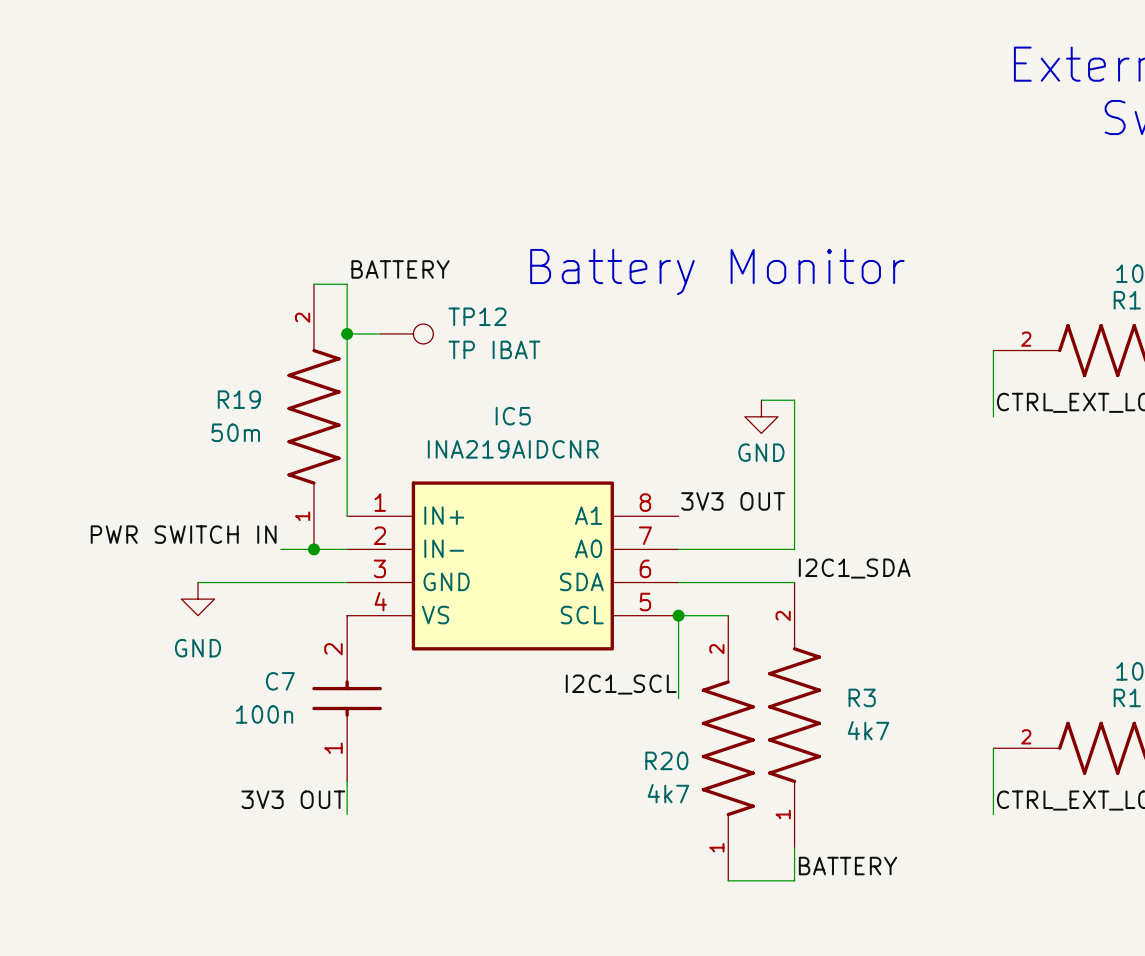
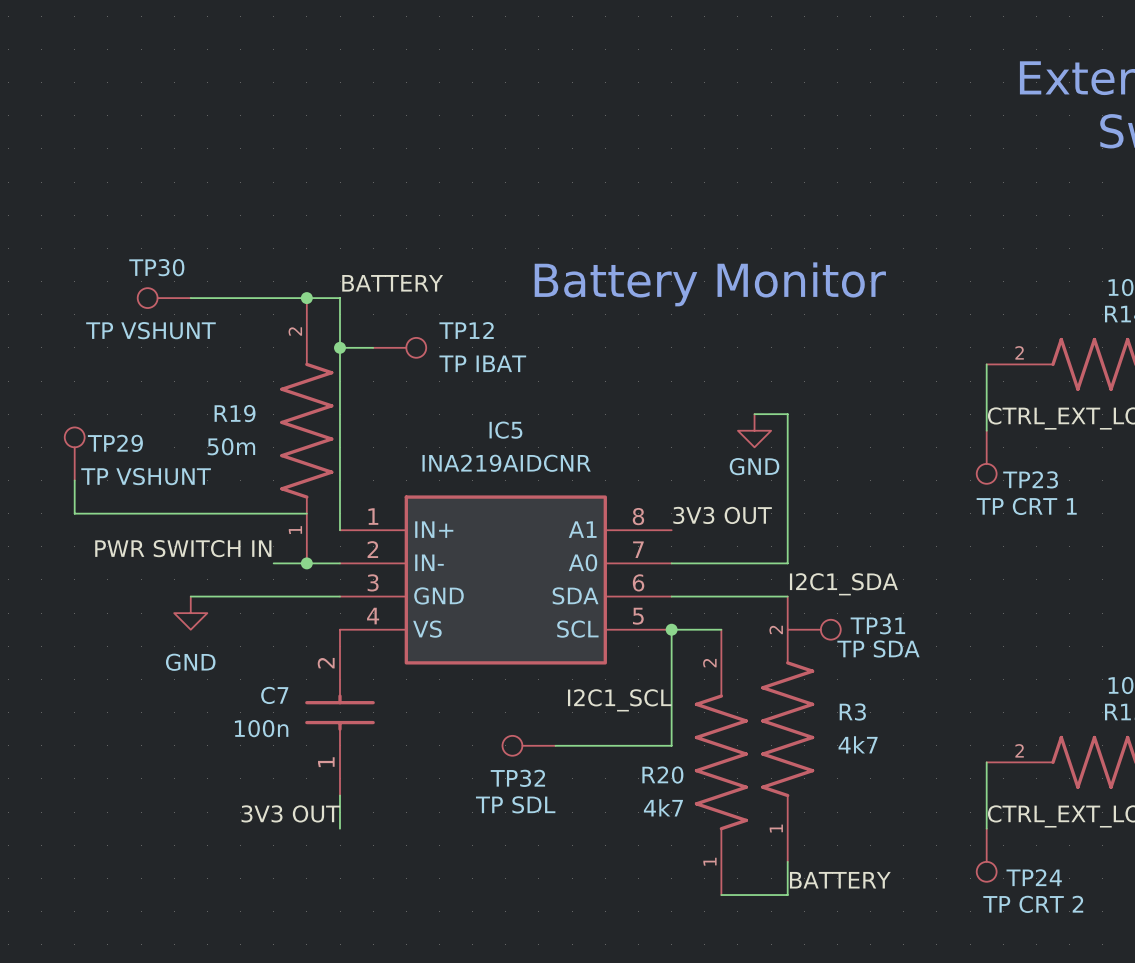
TP30: none -> TP VSHUNT (164, 298)
wire: none -> (190, 298) (306, 298)
junction: none -> (306, 298)
TP29: none -> TP VSHUNT (74, 453)
TP23: none -> TP CRT 1 (986, 457)
wire: none -> (74, 480) (74, 513) (306, 513)
TP31: none -> TP SDA (814, 629)
wire: none -> (671, 712) (671, 745) (555, 745)
TP32: none -> TP SDL (529, 745)
TP24: none -> TP CRT 2 (986, 855)

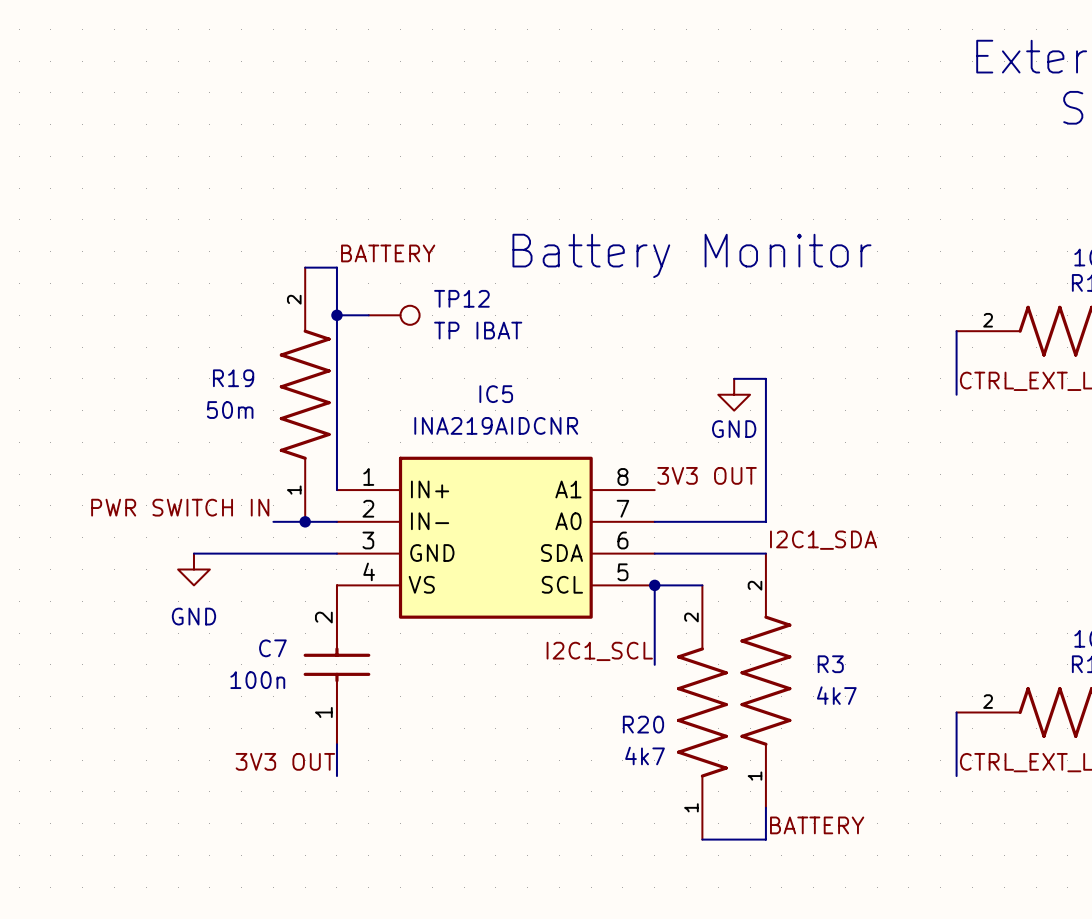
TP30: TP VSHUNT (164, 298) -> none
wire: (190, 298) (306, 298) -> none
junction: (306, 298) -> none
TP29: TP VSHUNT (74, 453) -> none
TP23: TP CRT 1 (986, 457) -> none
wire: (74, 480) (74, 513) (306, 513) -> none
TP31: TP SDA (814, 629) -> none
wire: (671, 712) (671, 745) (555, 745) -> none
TP32: TP SDL (529, 745) -> none
TP24: TP CRT 2 (986, 855) -> none

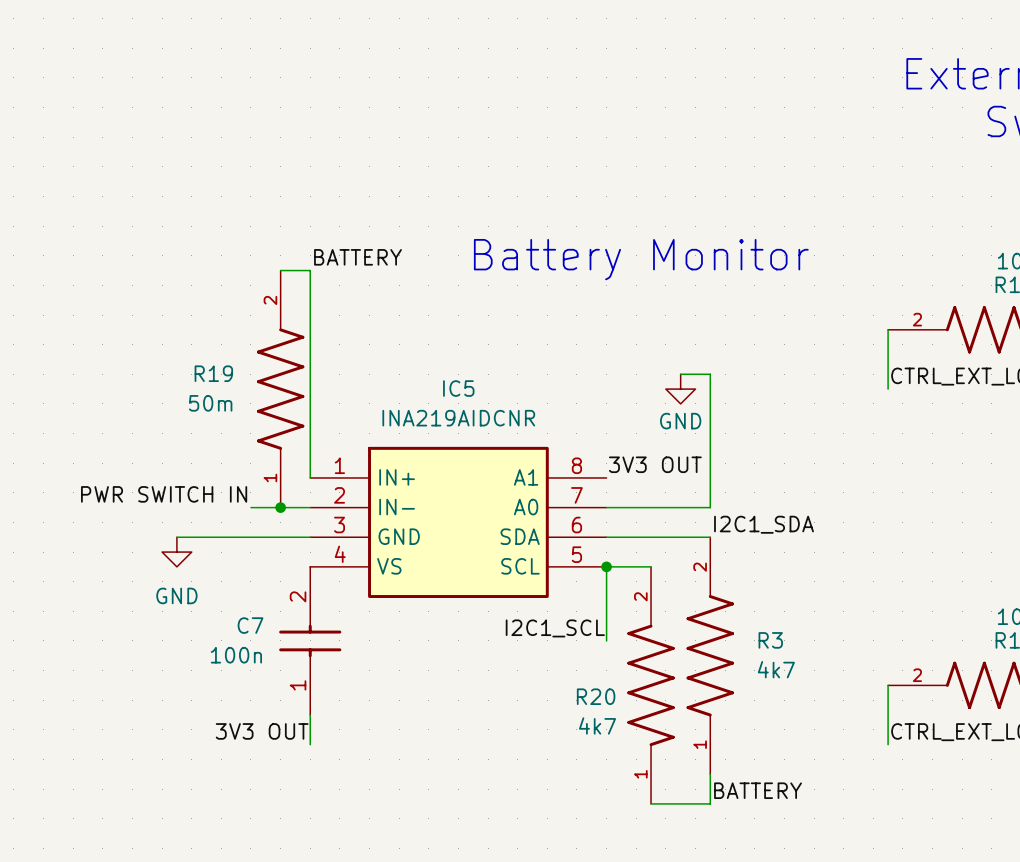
wire: (336, 315) (368, 315) -> none
junction: (336, 315) -> none
TP12: TP IBAT (394, 315) -> none

